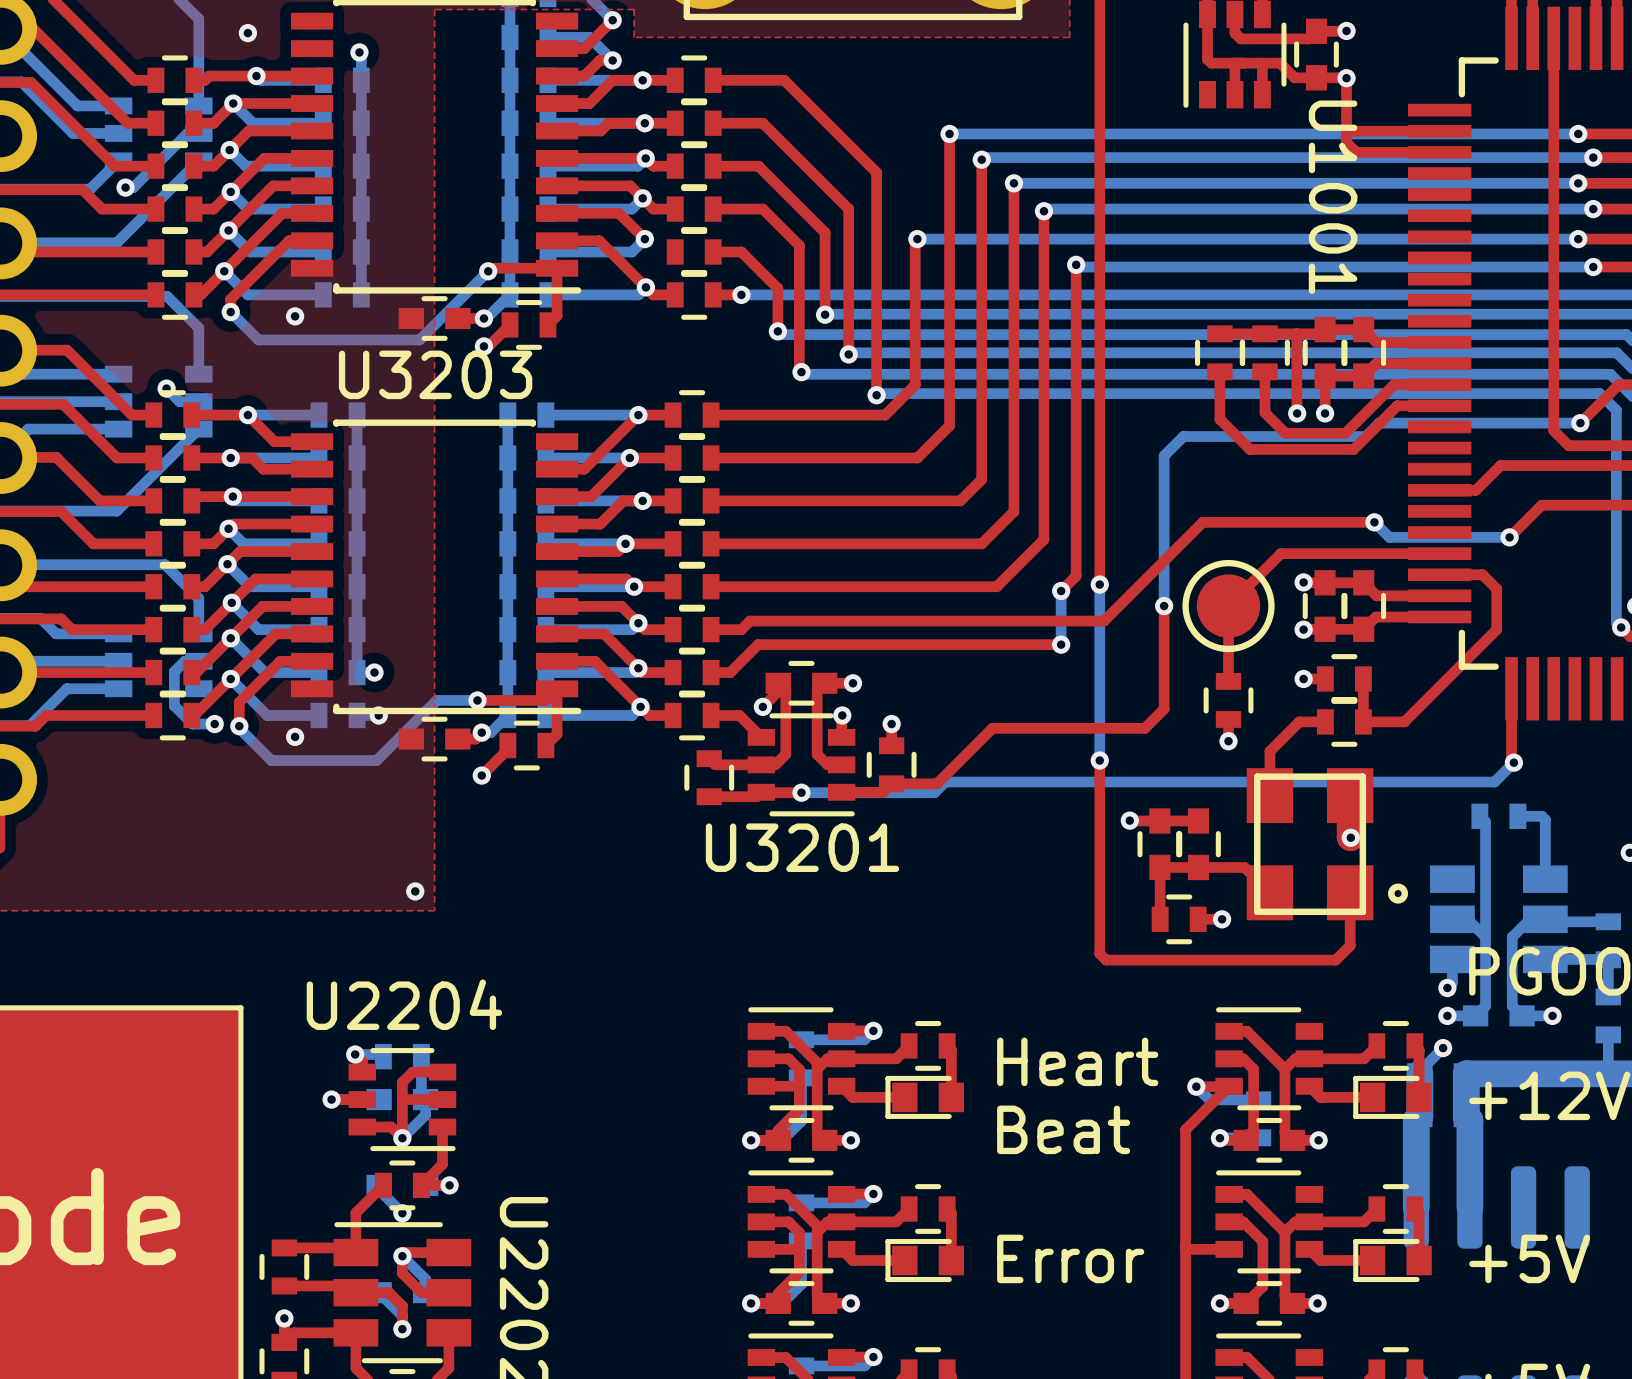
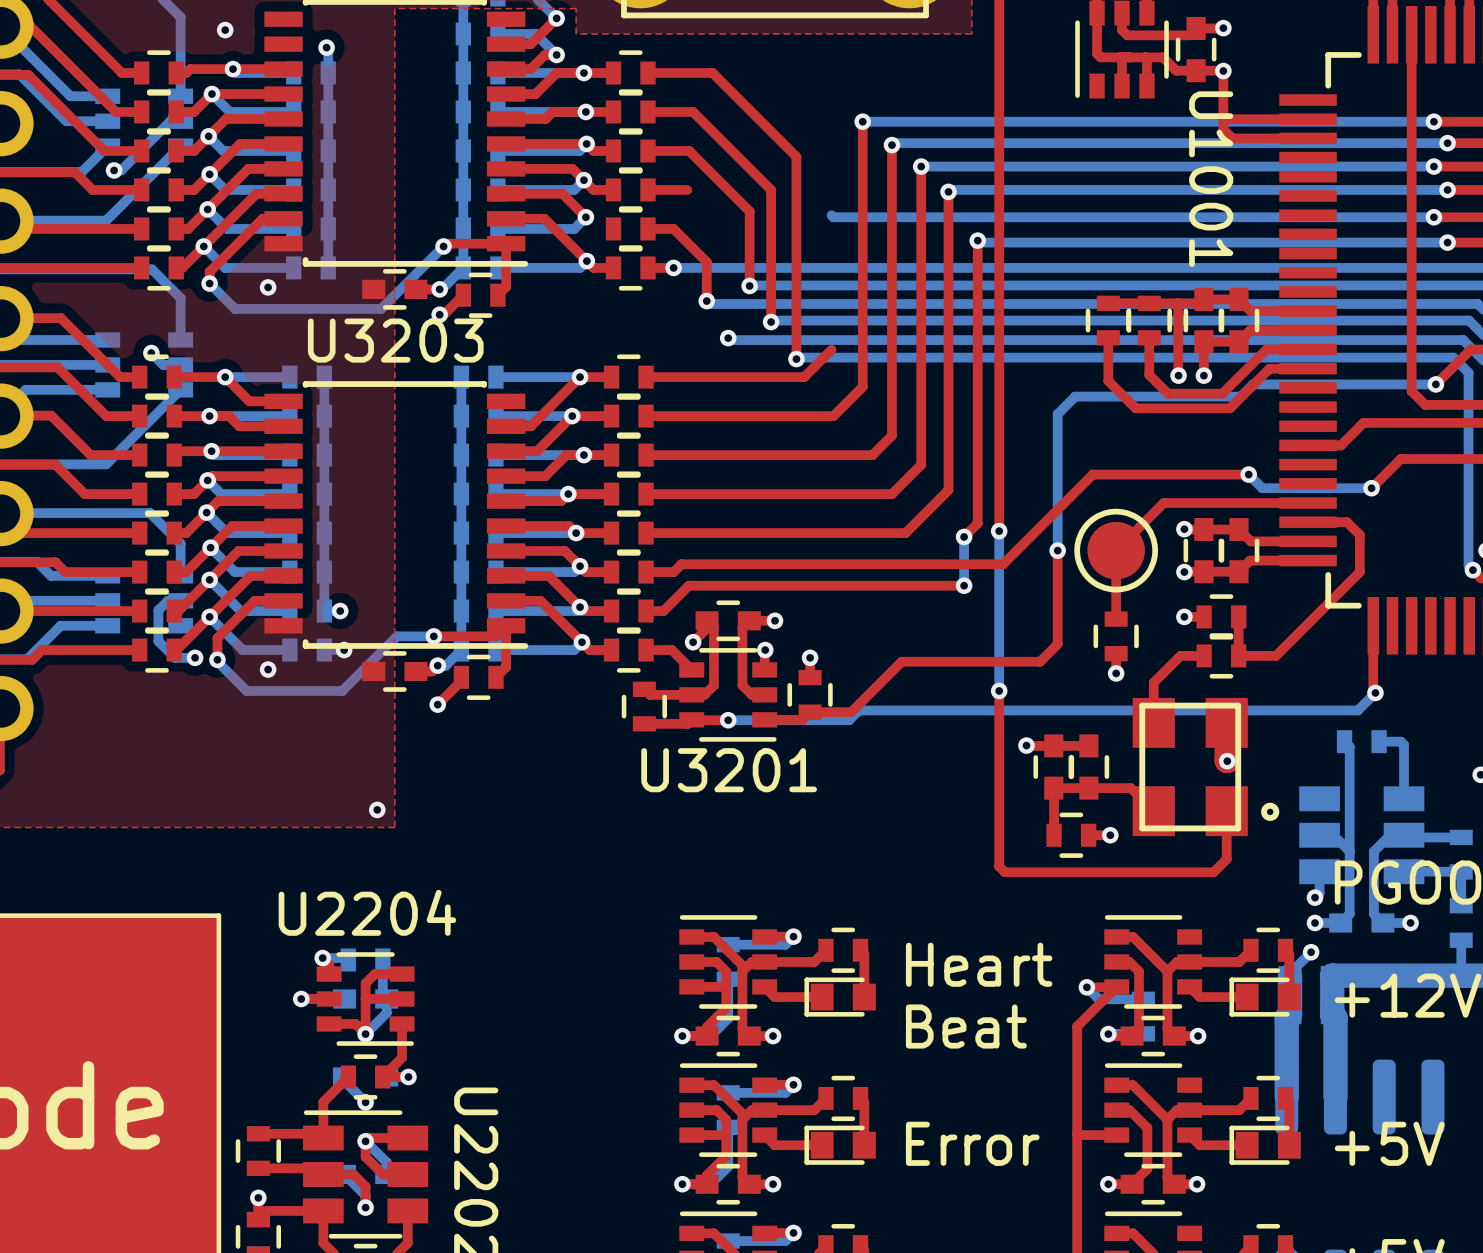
top track: (756, 209) (762, 209) (799, 245) (799, 370) (801, 372) -> none
top track: (917, 239) (915, 241) (915, 385) -> none
via: (917, 239) -> none

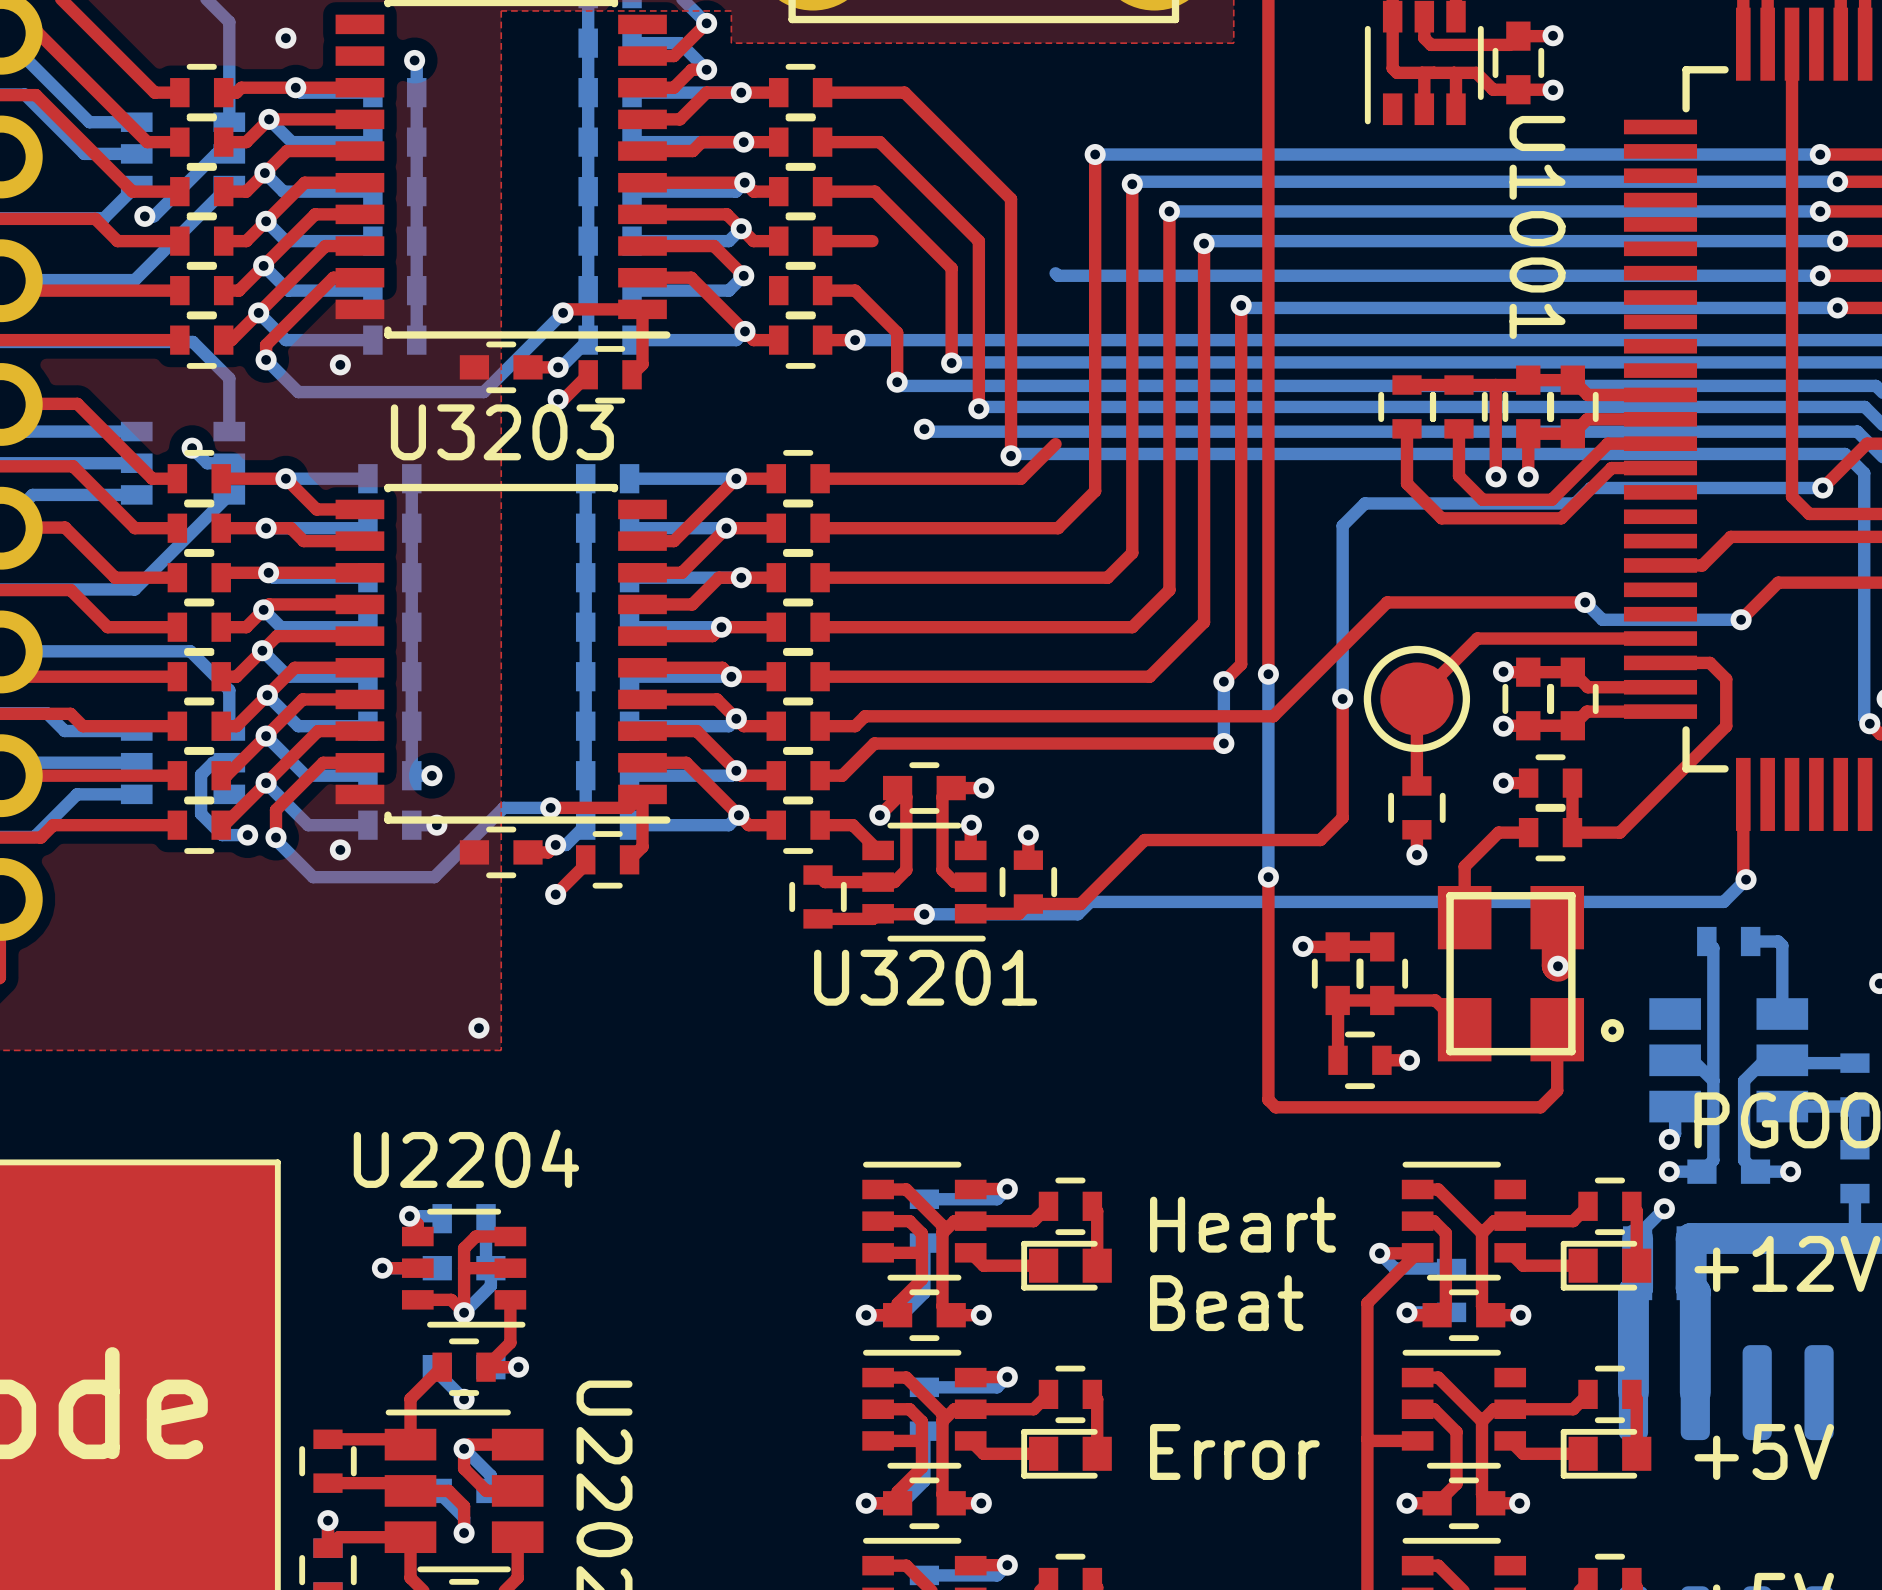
top track: (1223, 71) (1223, 129) (1232, 138) (1308, 138) -> none
top track: (1223, 119) (1308, 119) -> none

